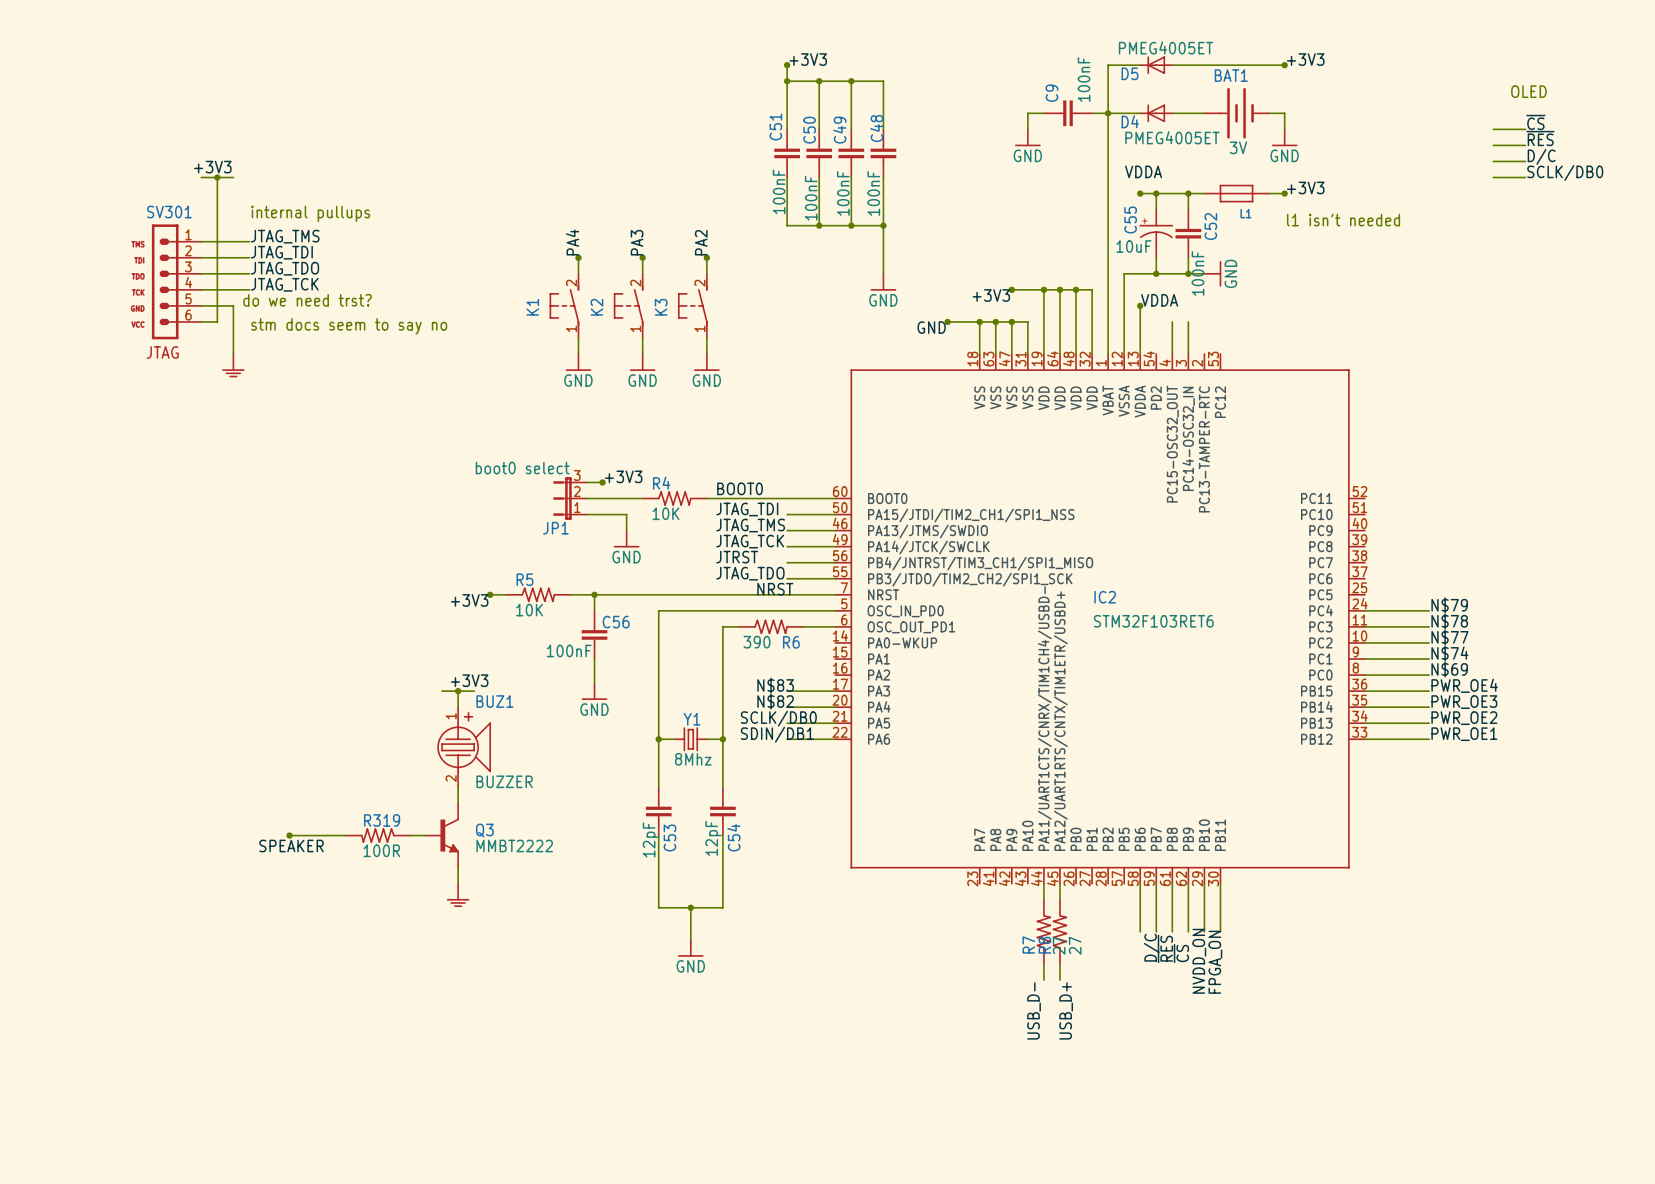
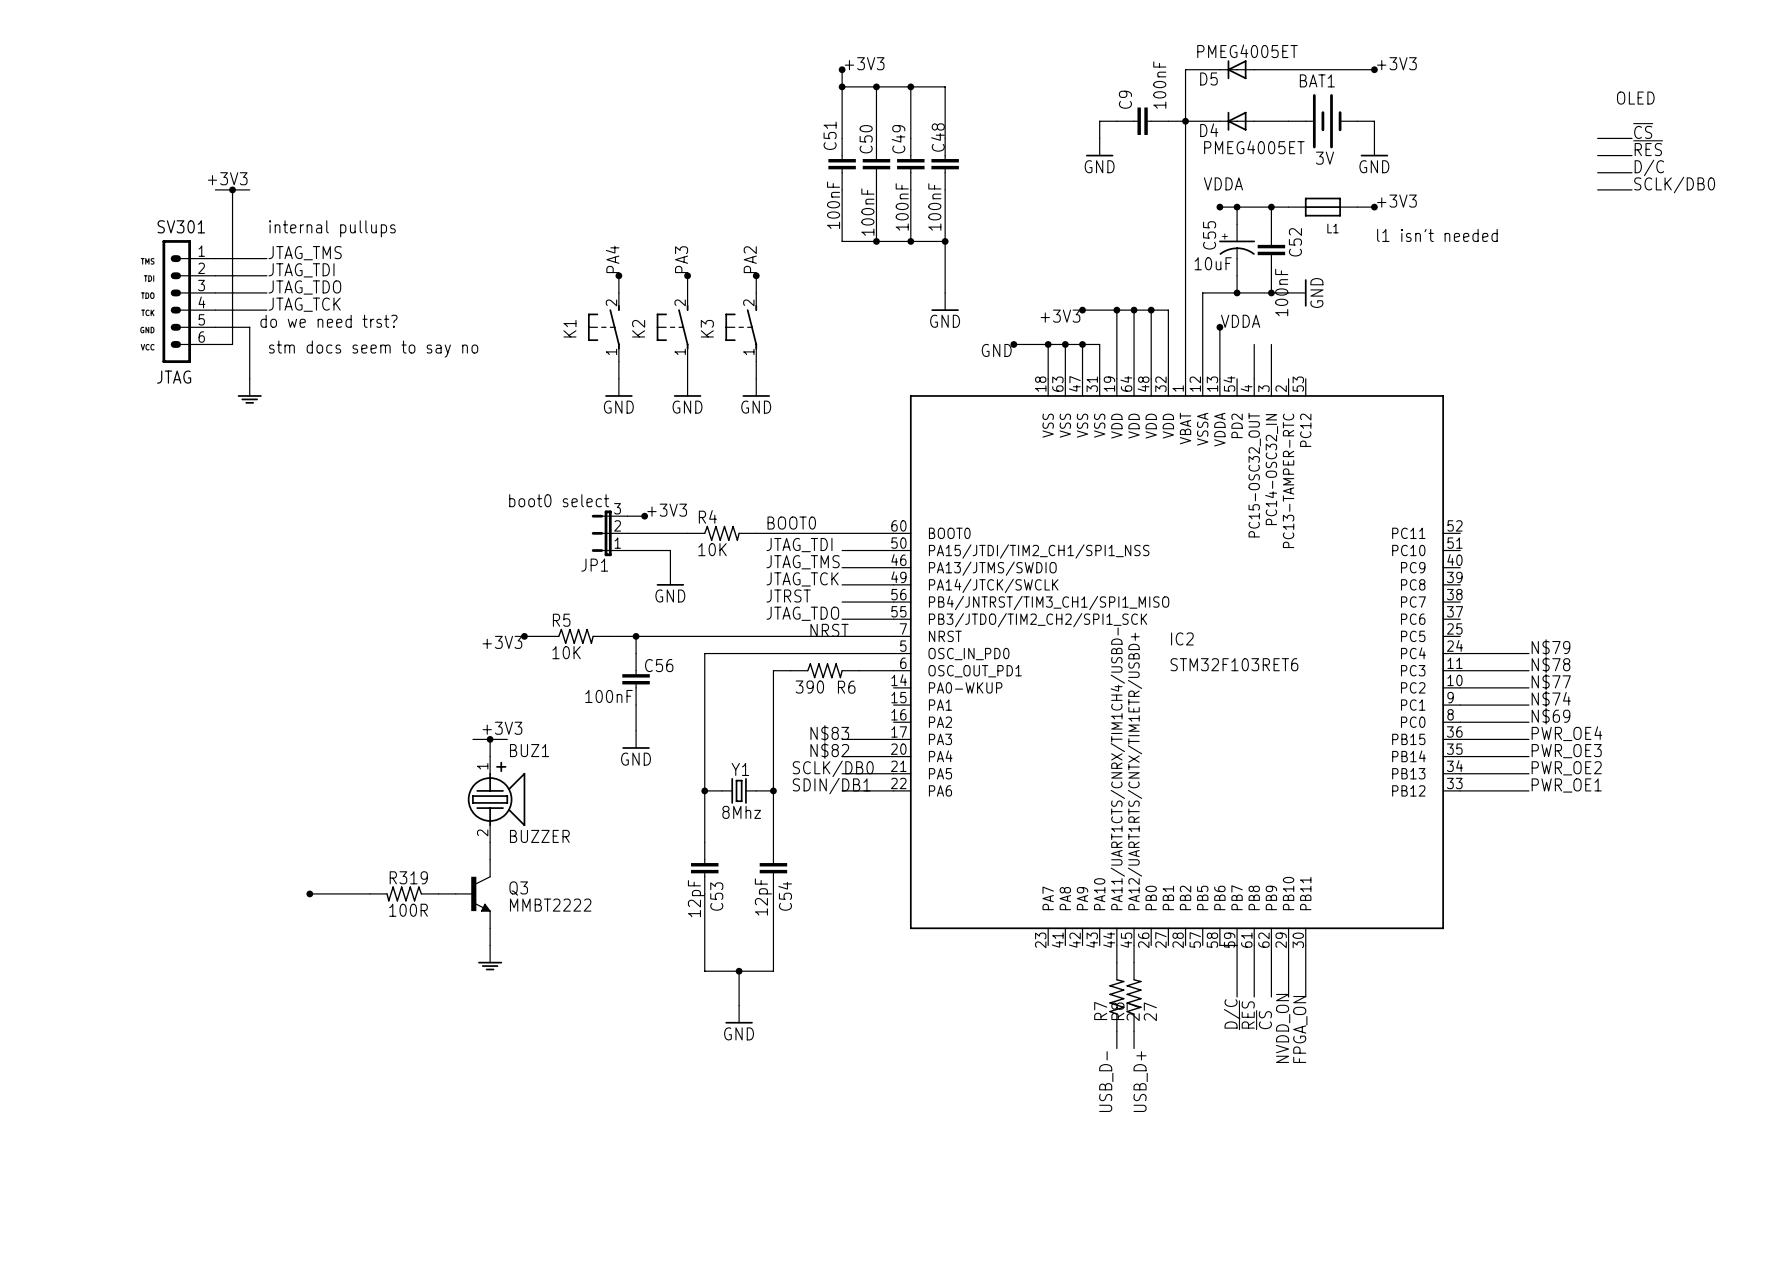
label: SPEAKER (291, 846) -> none
wire: (1140, 883) (1140, 931) -> (1219, 945) (1237, 945)

